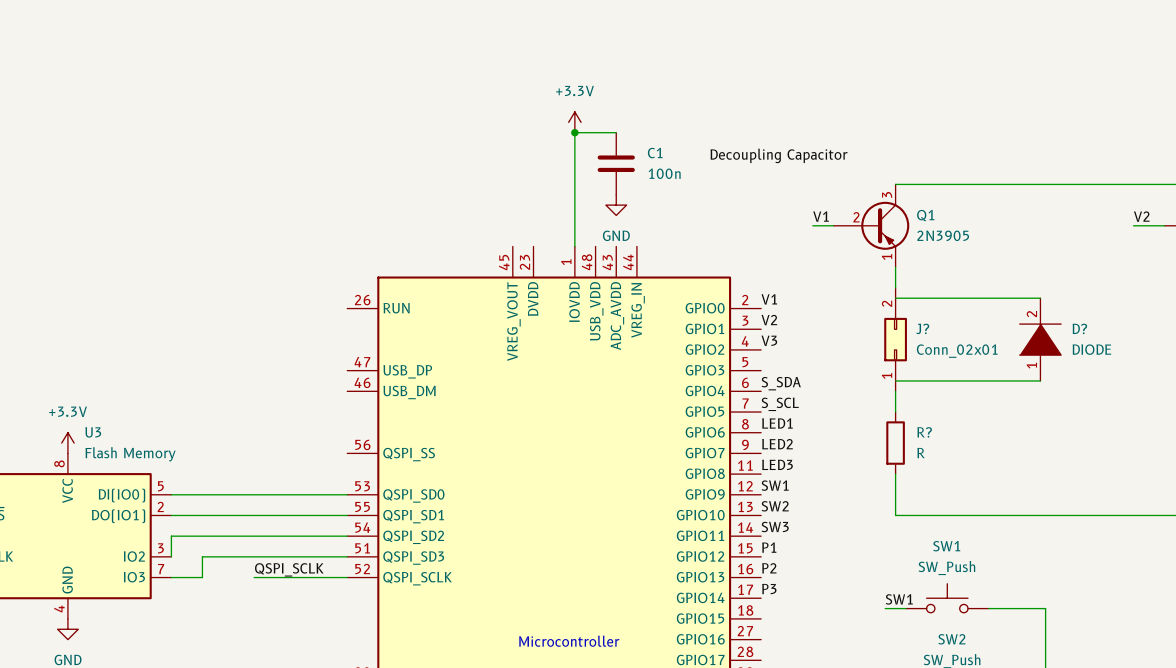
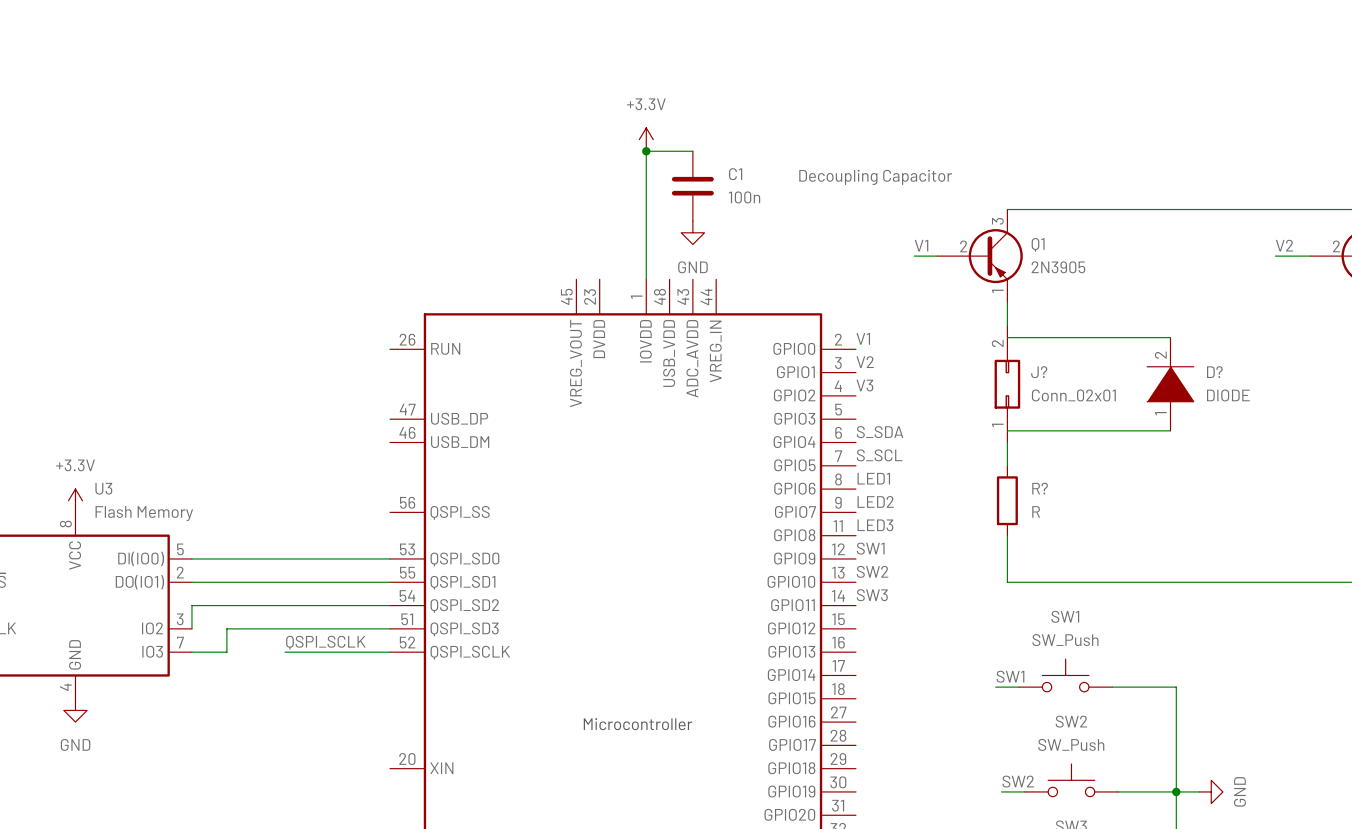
label: P1 (769, 547) -> none
label: P2 (769, 568) -> none
label: P3 (769, 589) -> none

